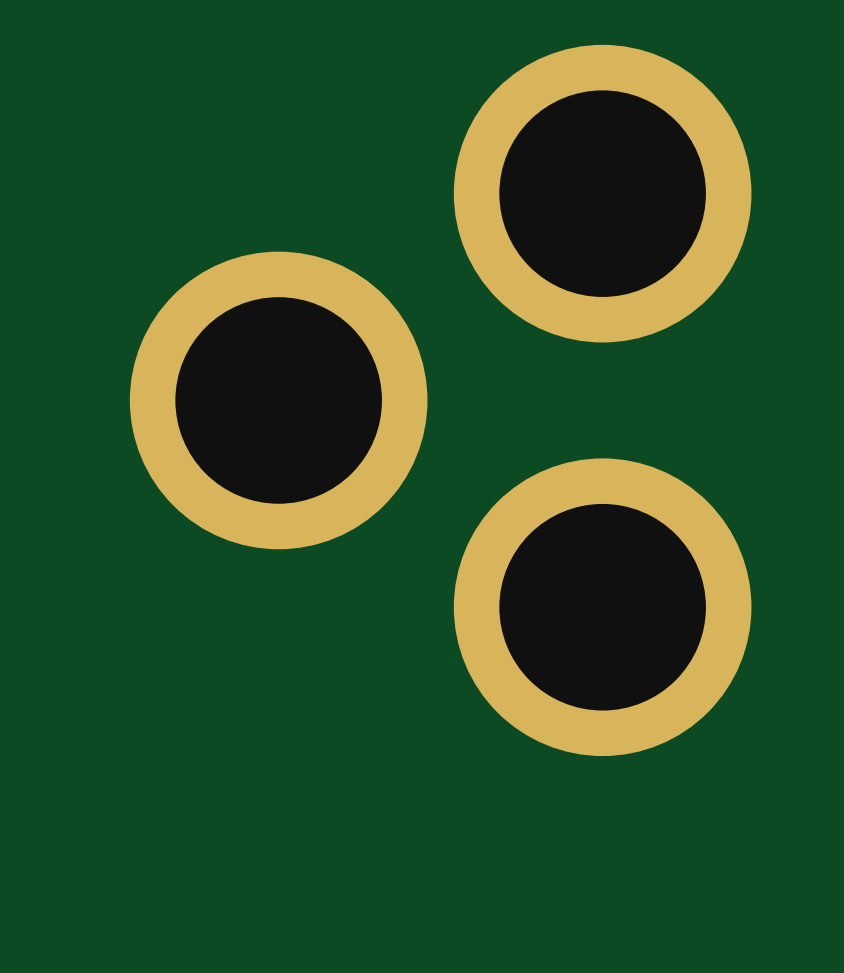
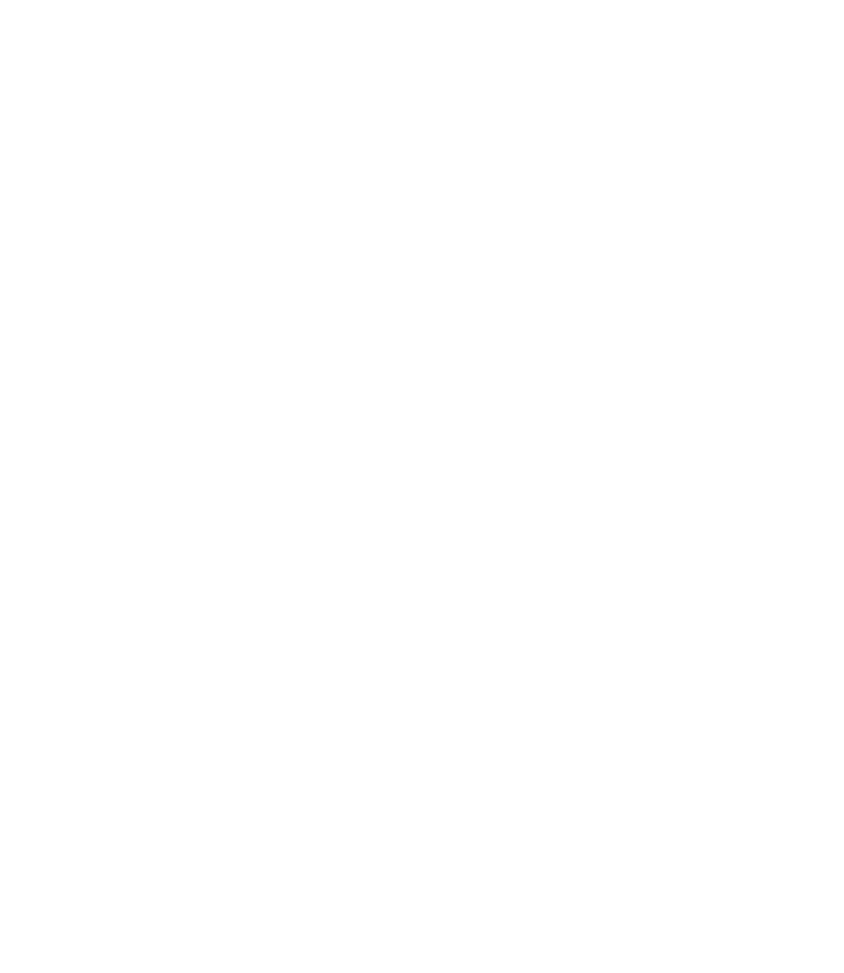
part: (440, 400) -> none

